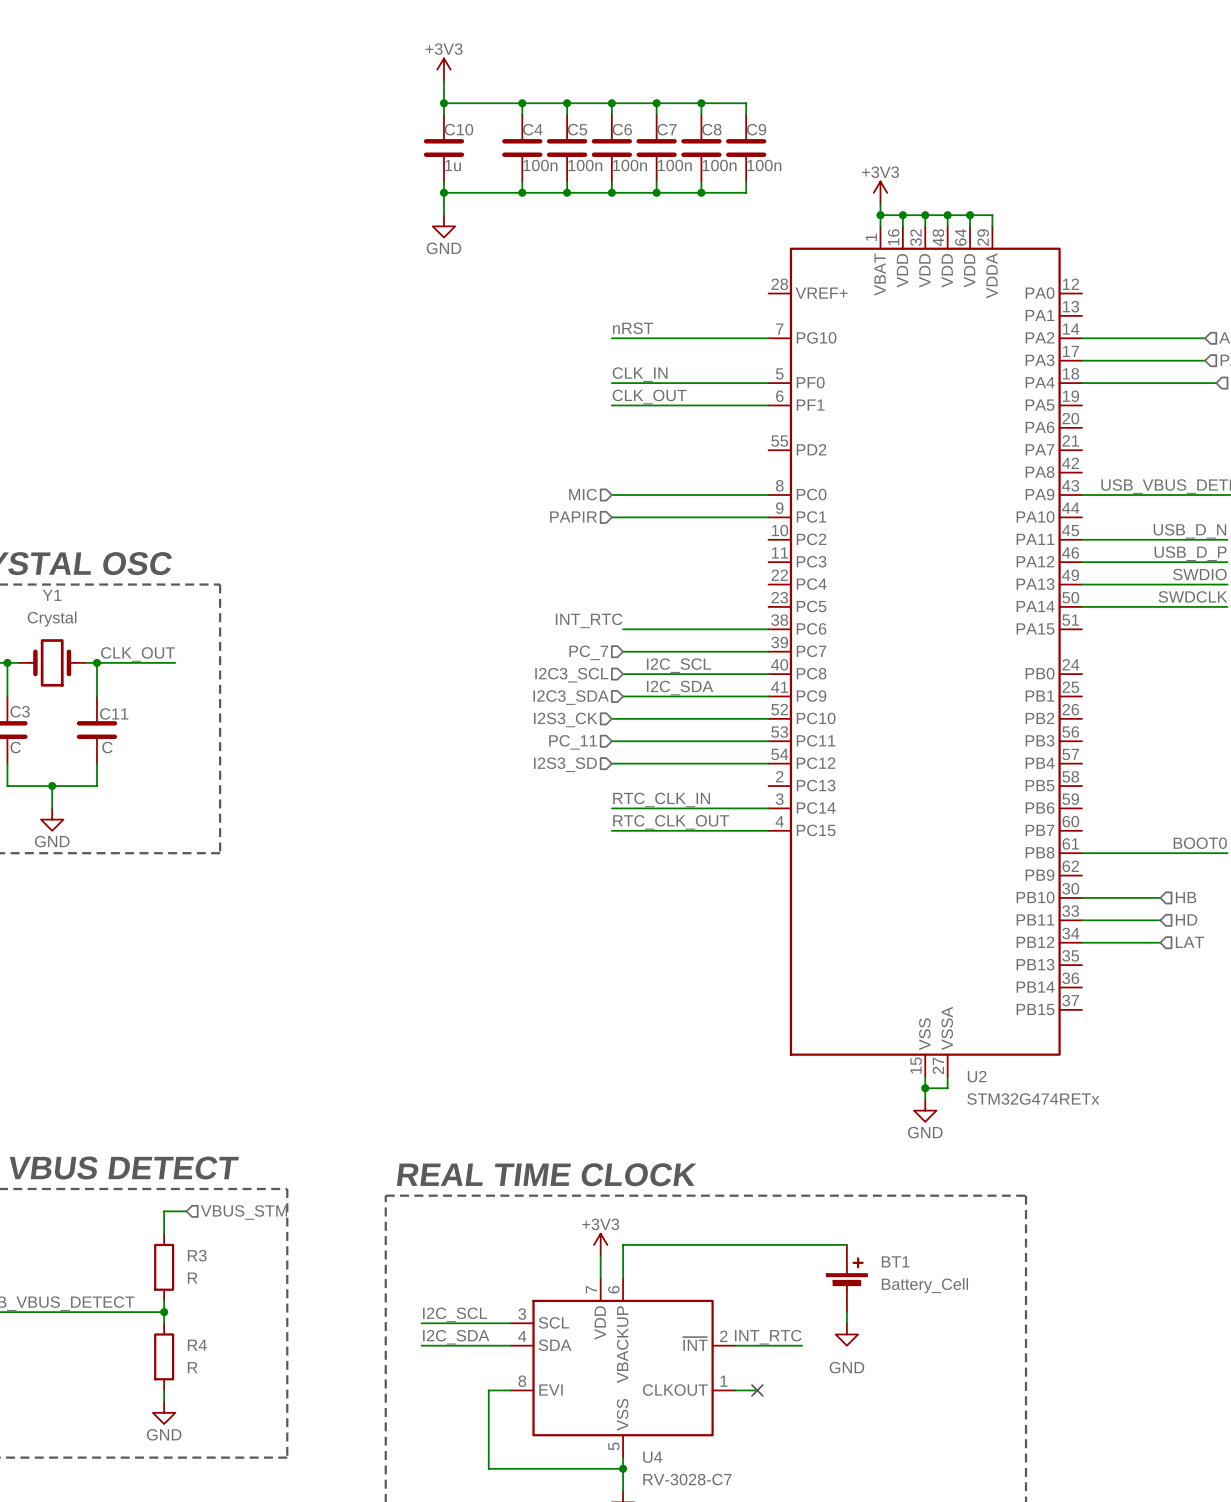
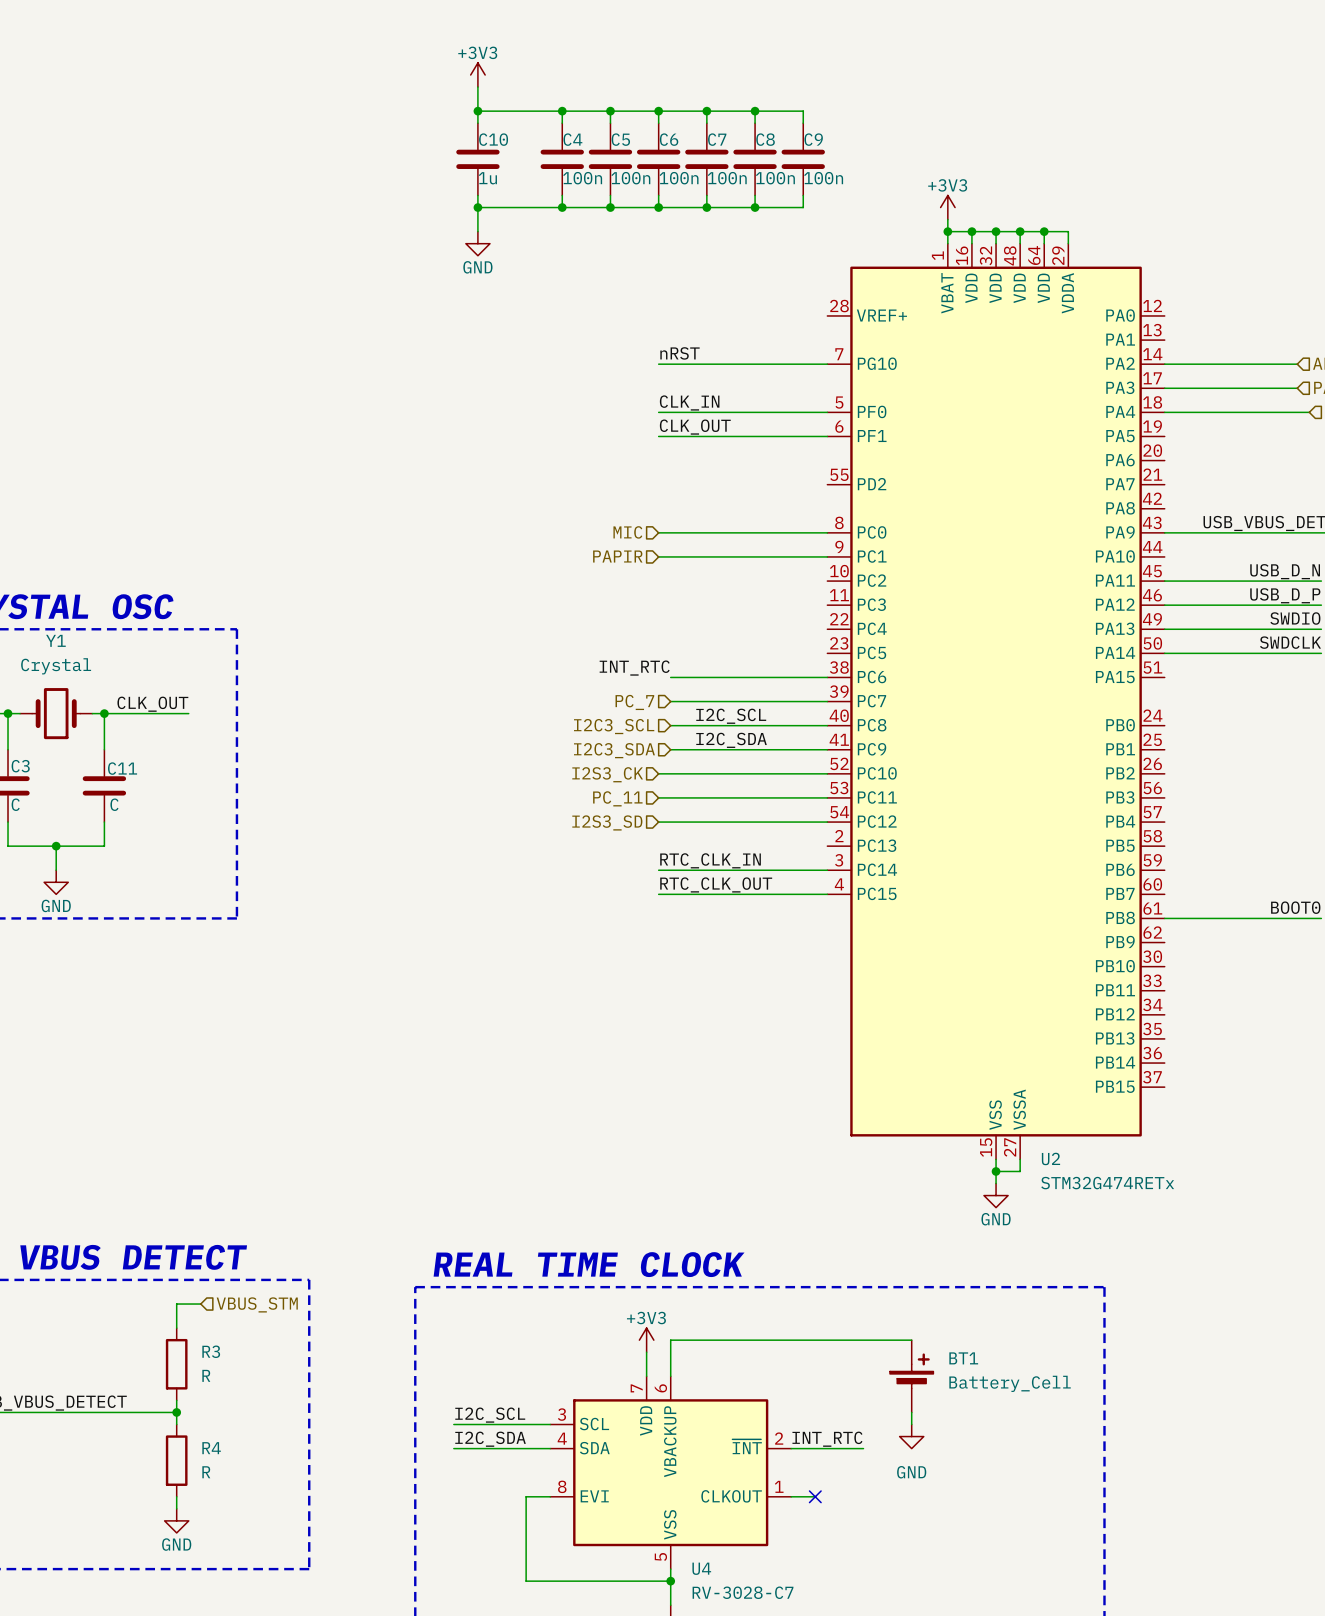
wire: (1081, 897) (1160, 897) -> none
hierarchical label: HB (1186, 897) -> none
hierarchical label: HD (1186, 919) -> none
wire: (1081, 920) (1160, 920) -> none
wire: (1081, 942) (1160, 942) -> none
hierarchical label: LAT (1189, 942) -> none

